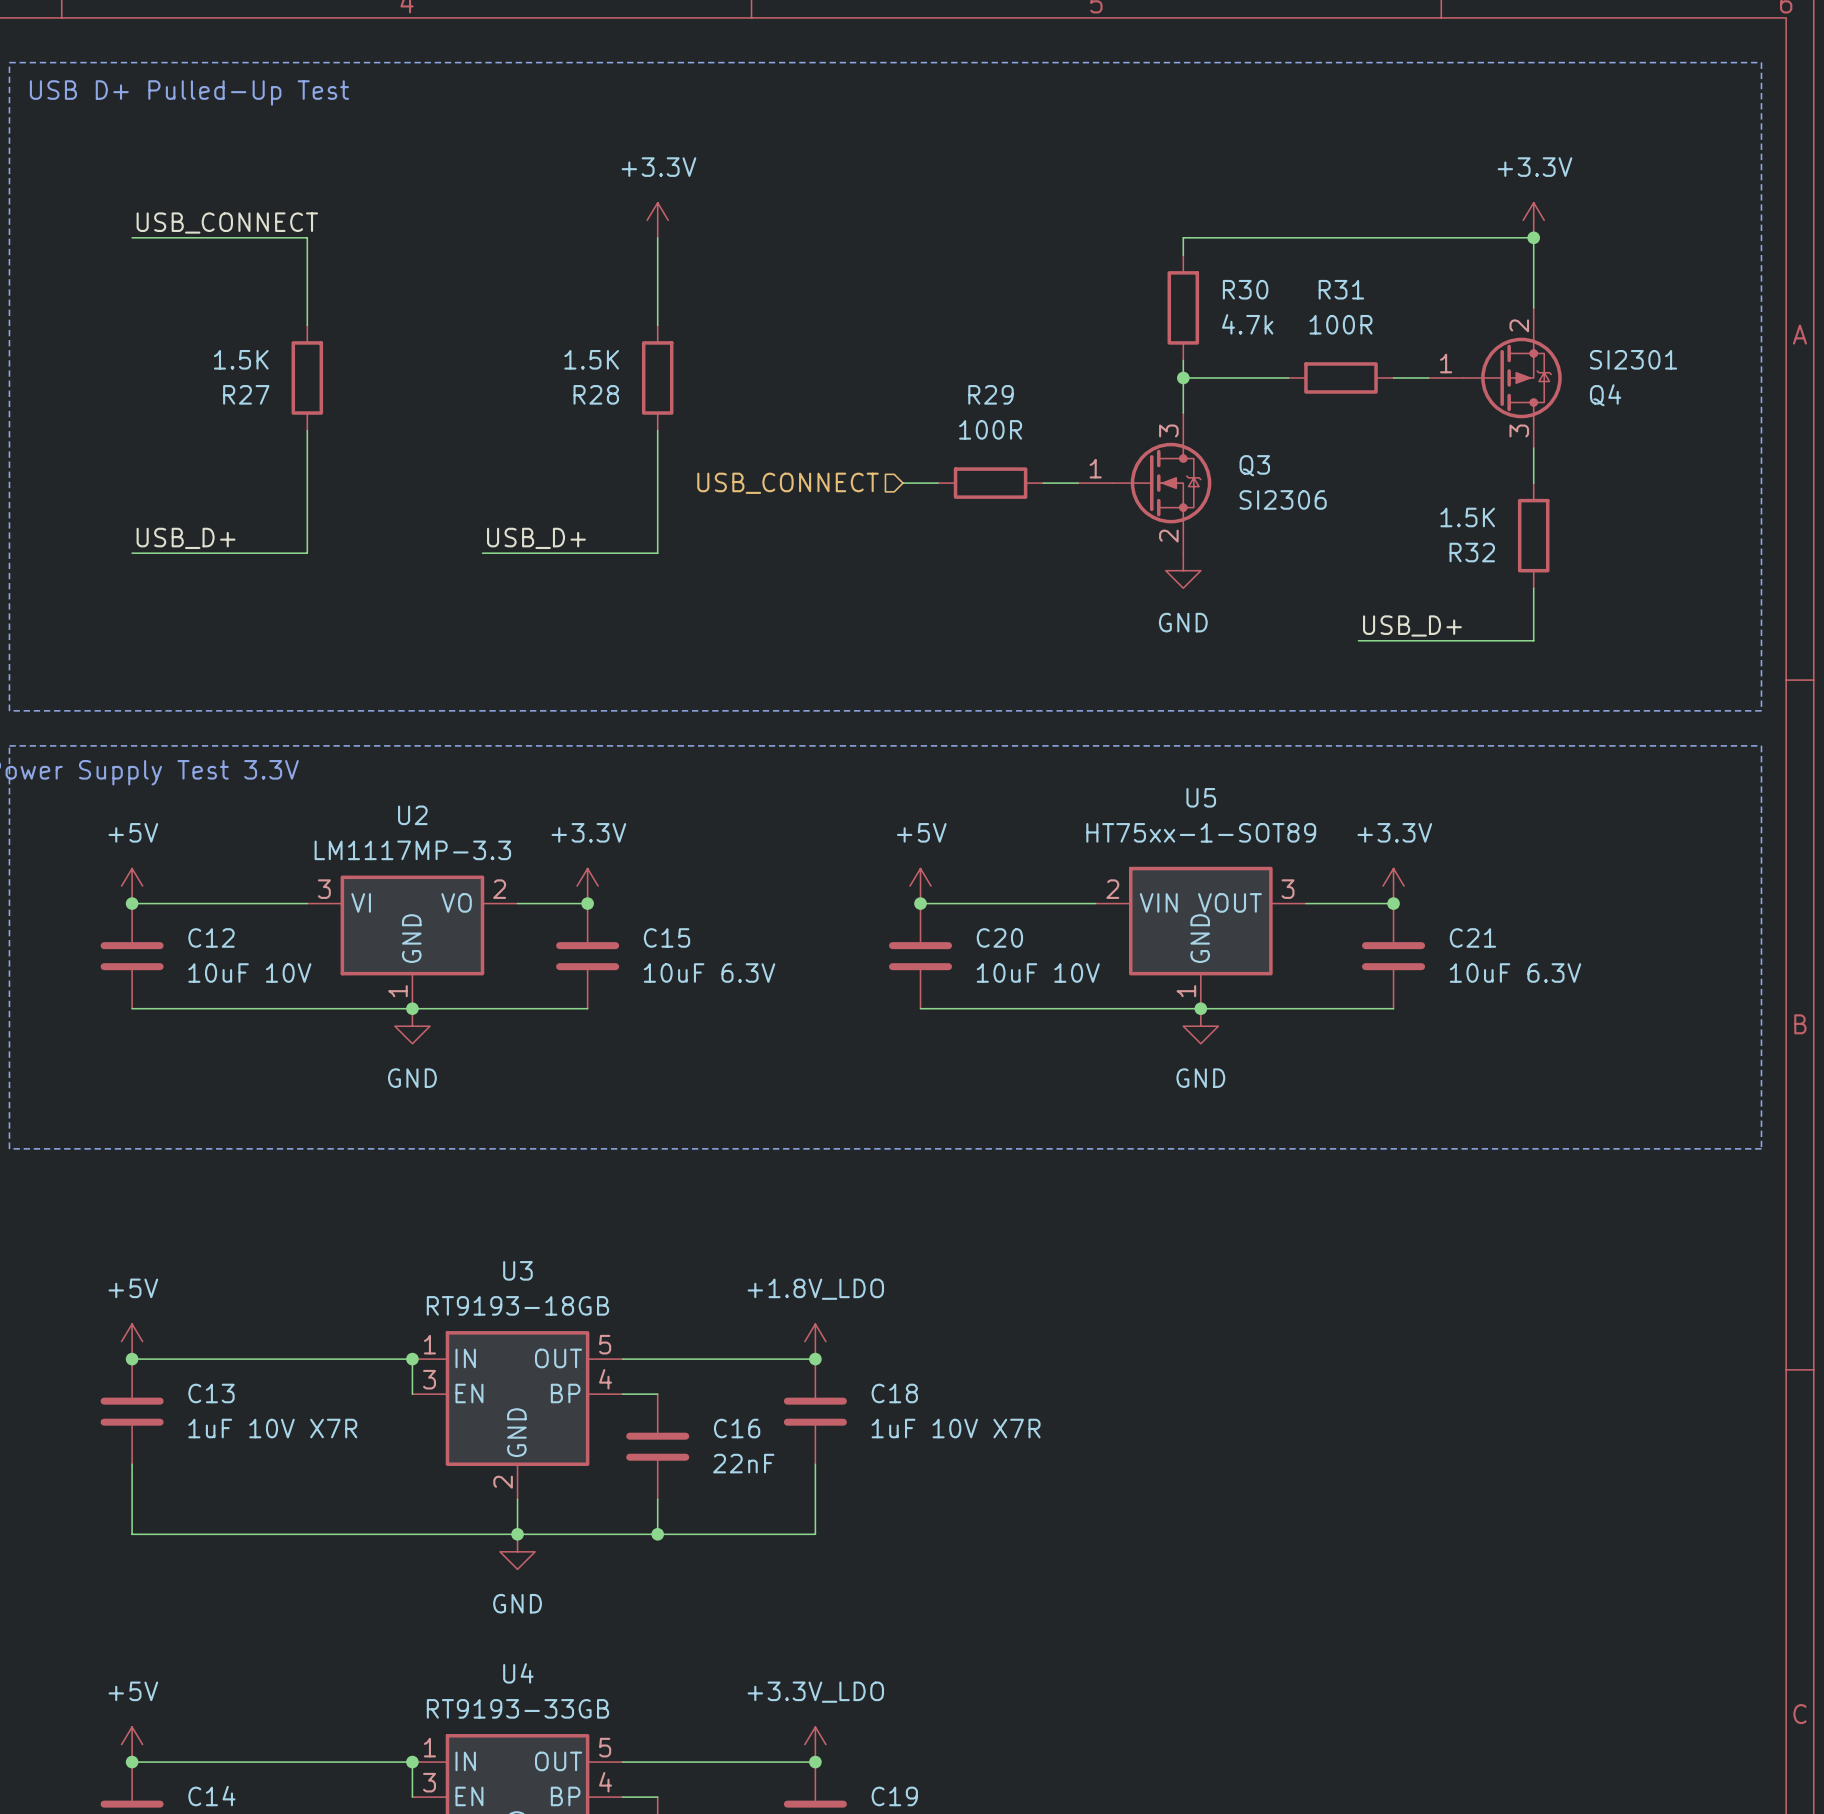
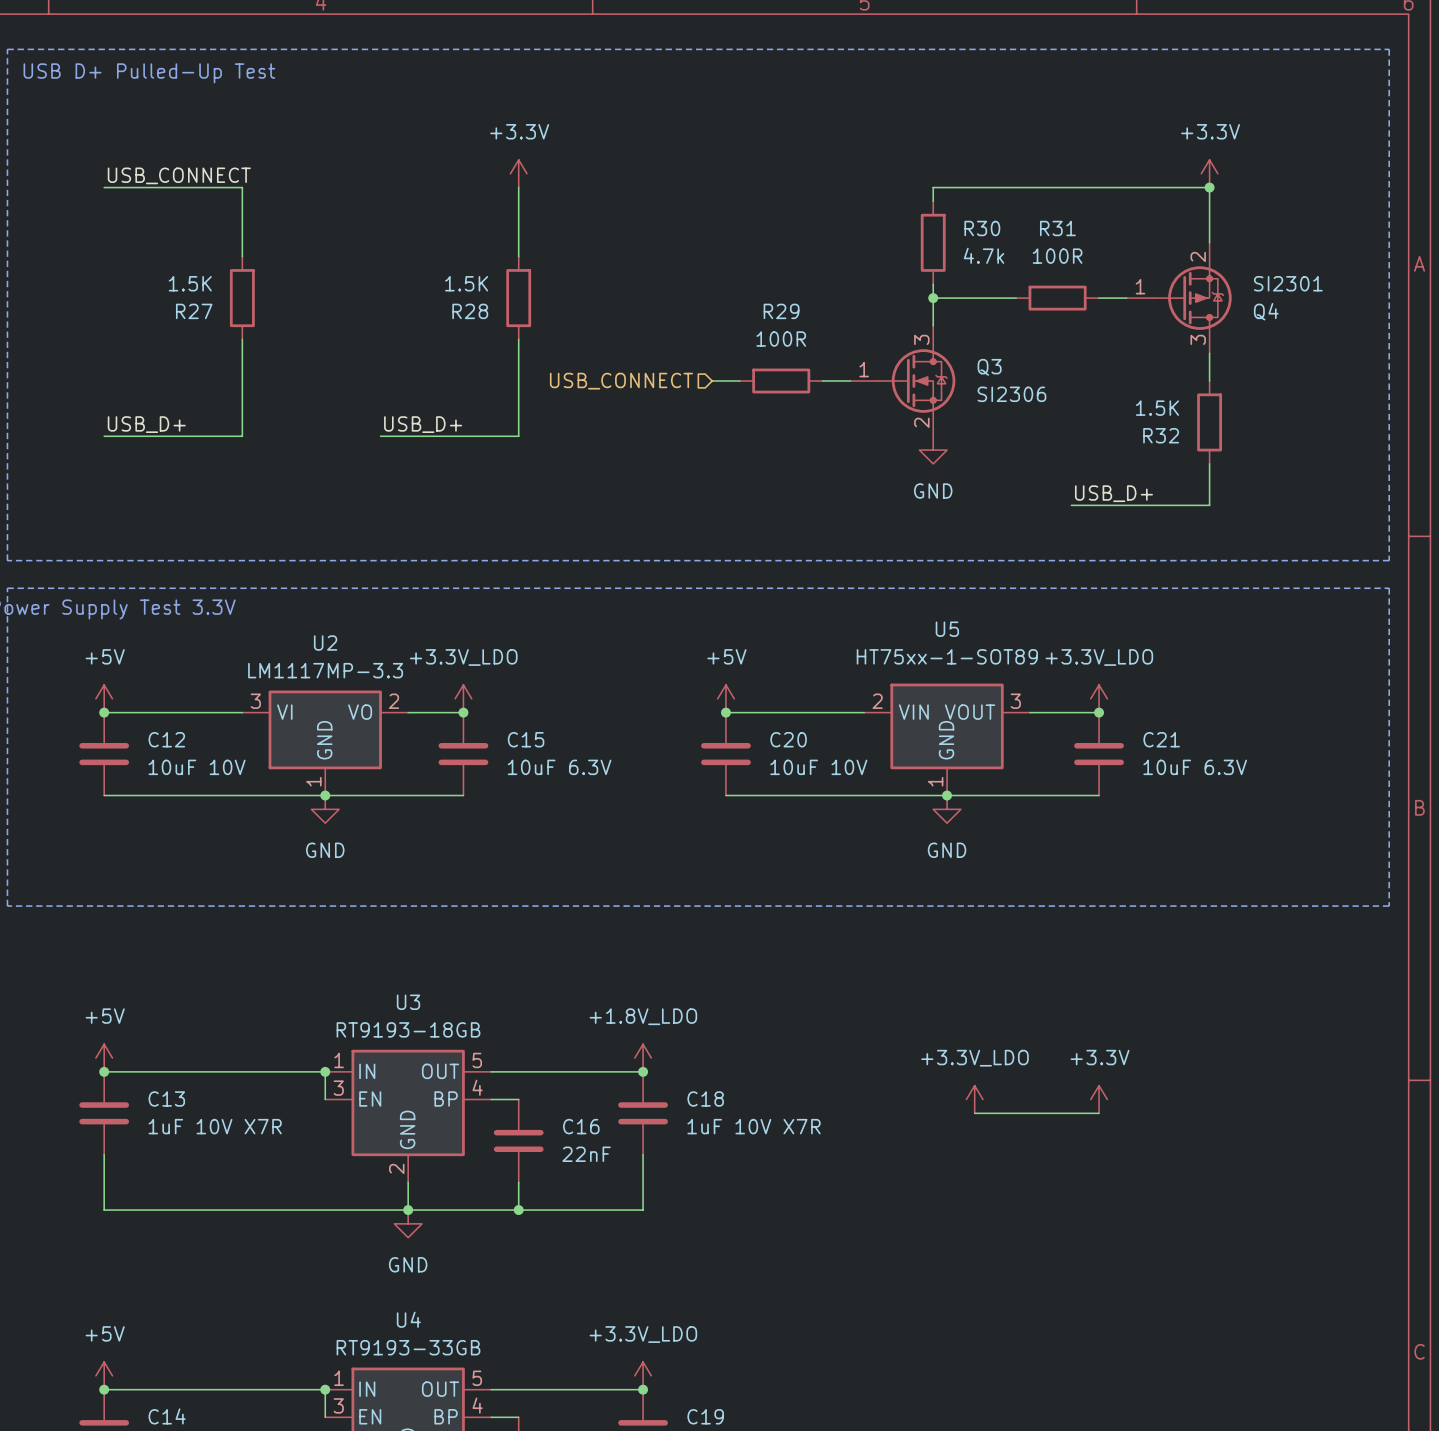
power symbol: +3.3V (587, 886) -> +3.3V_LDO (463, 698)
power symbol: +3.3V (1393, 886) -> +3.3V_LDO (1099, 698)
power symbol: none -> +3.3V_LDO (974, 1099)
power symbol: none -> +3.3V (1099, 1099)
wire: none -> (974, 1113) (1099, 1113)

